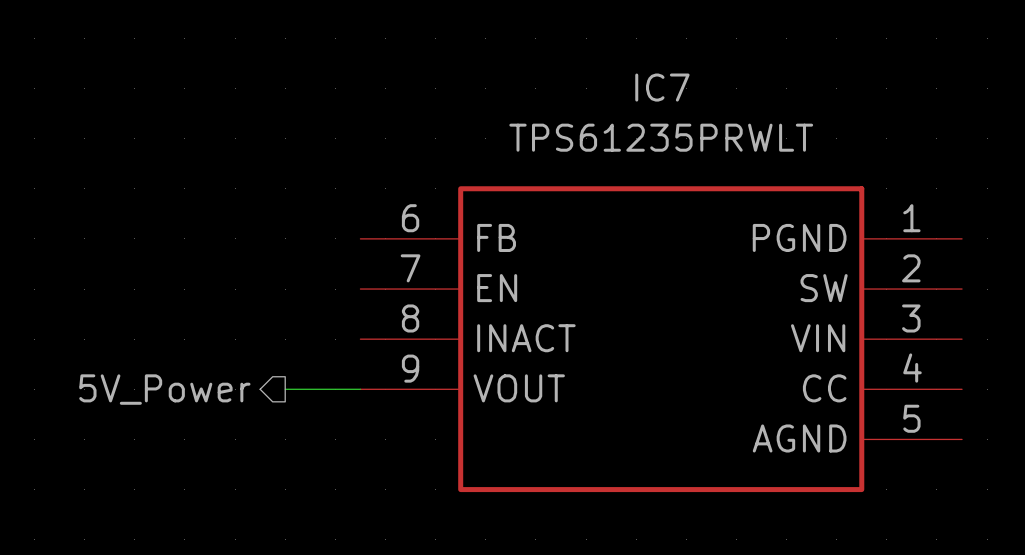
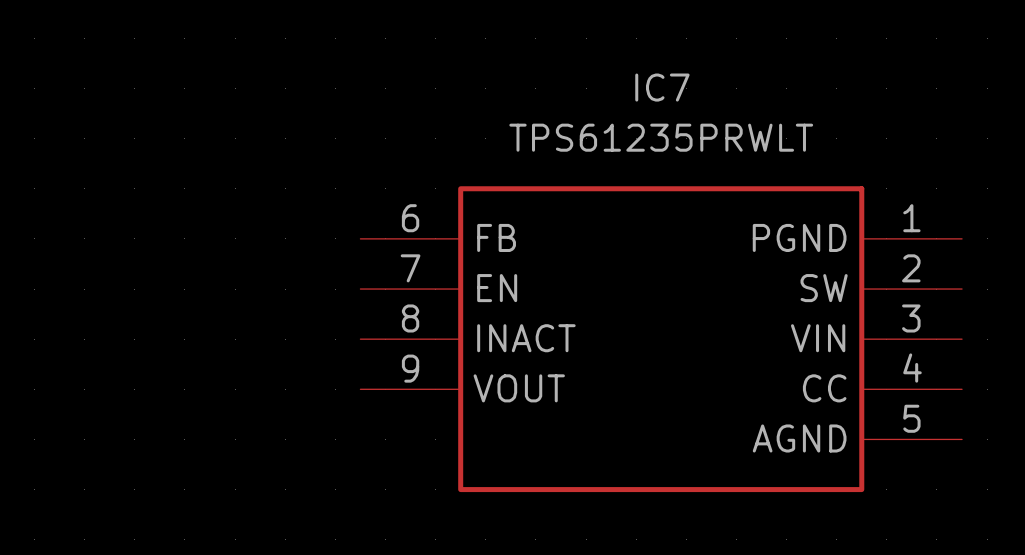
hierarchical label: 5V_Power (164, 389) -> none
wire: (285, 389) (360, 389) -> none

